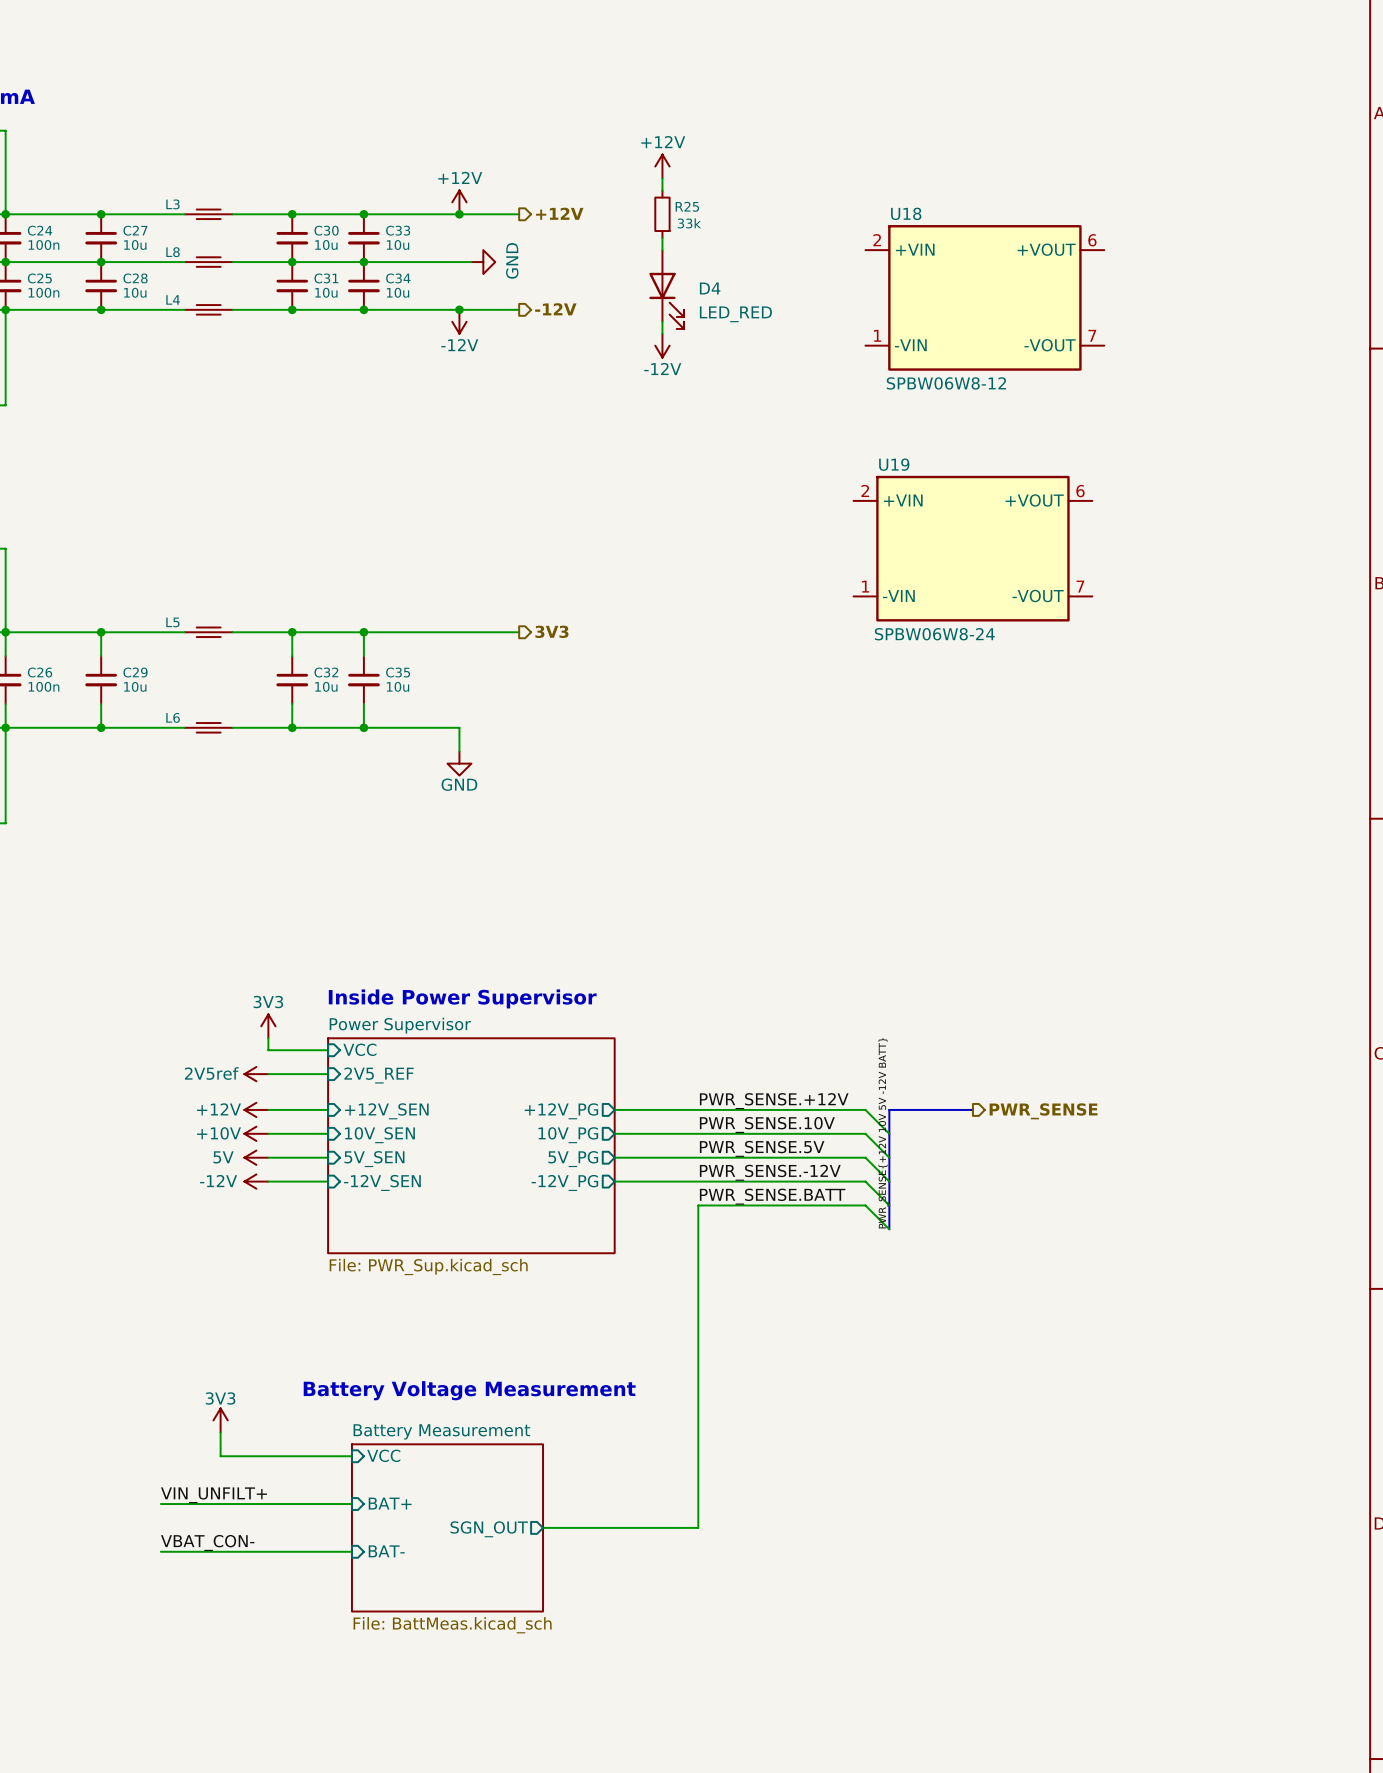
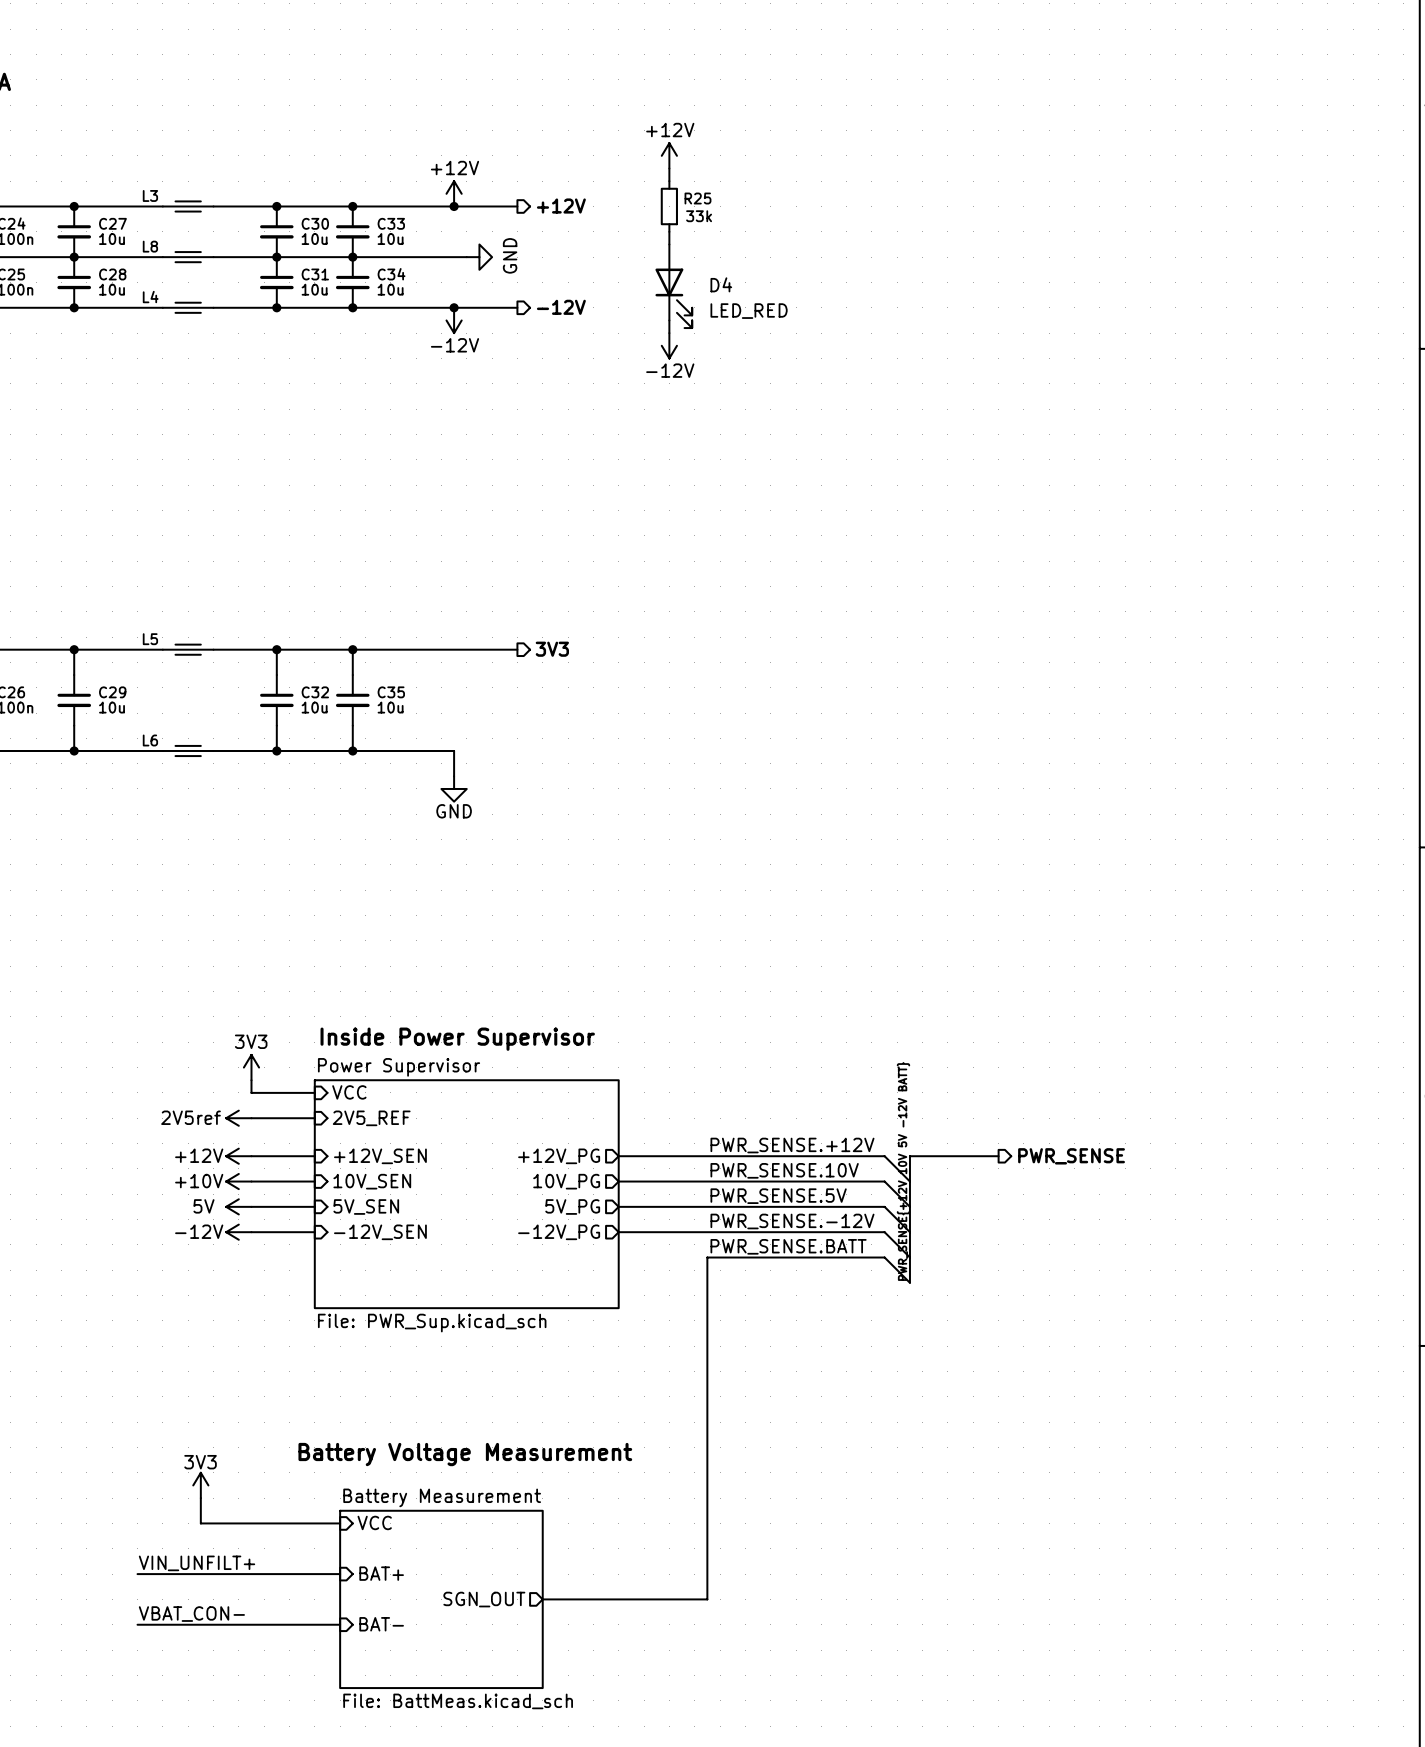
U18: (984, 297) -> none
U19: (972, 548) -> none

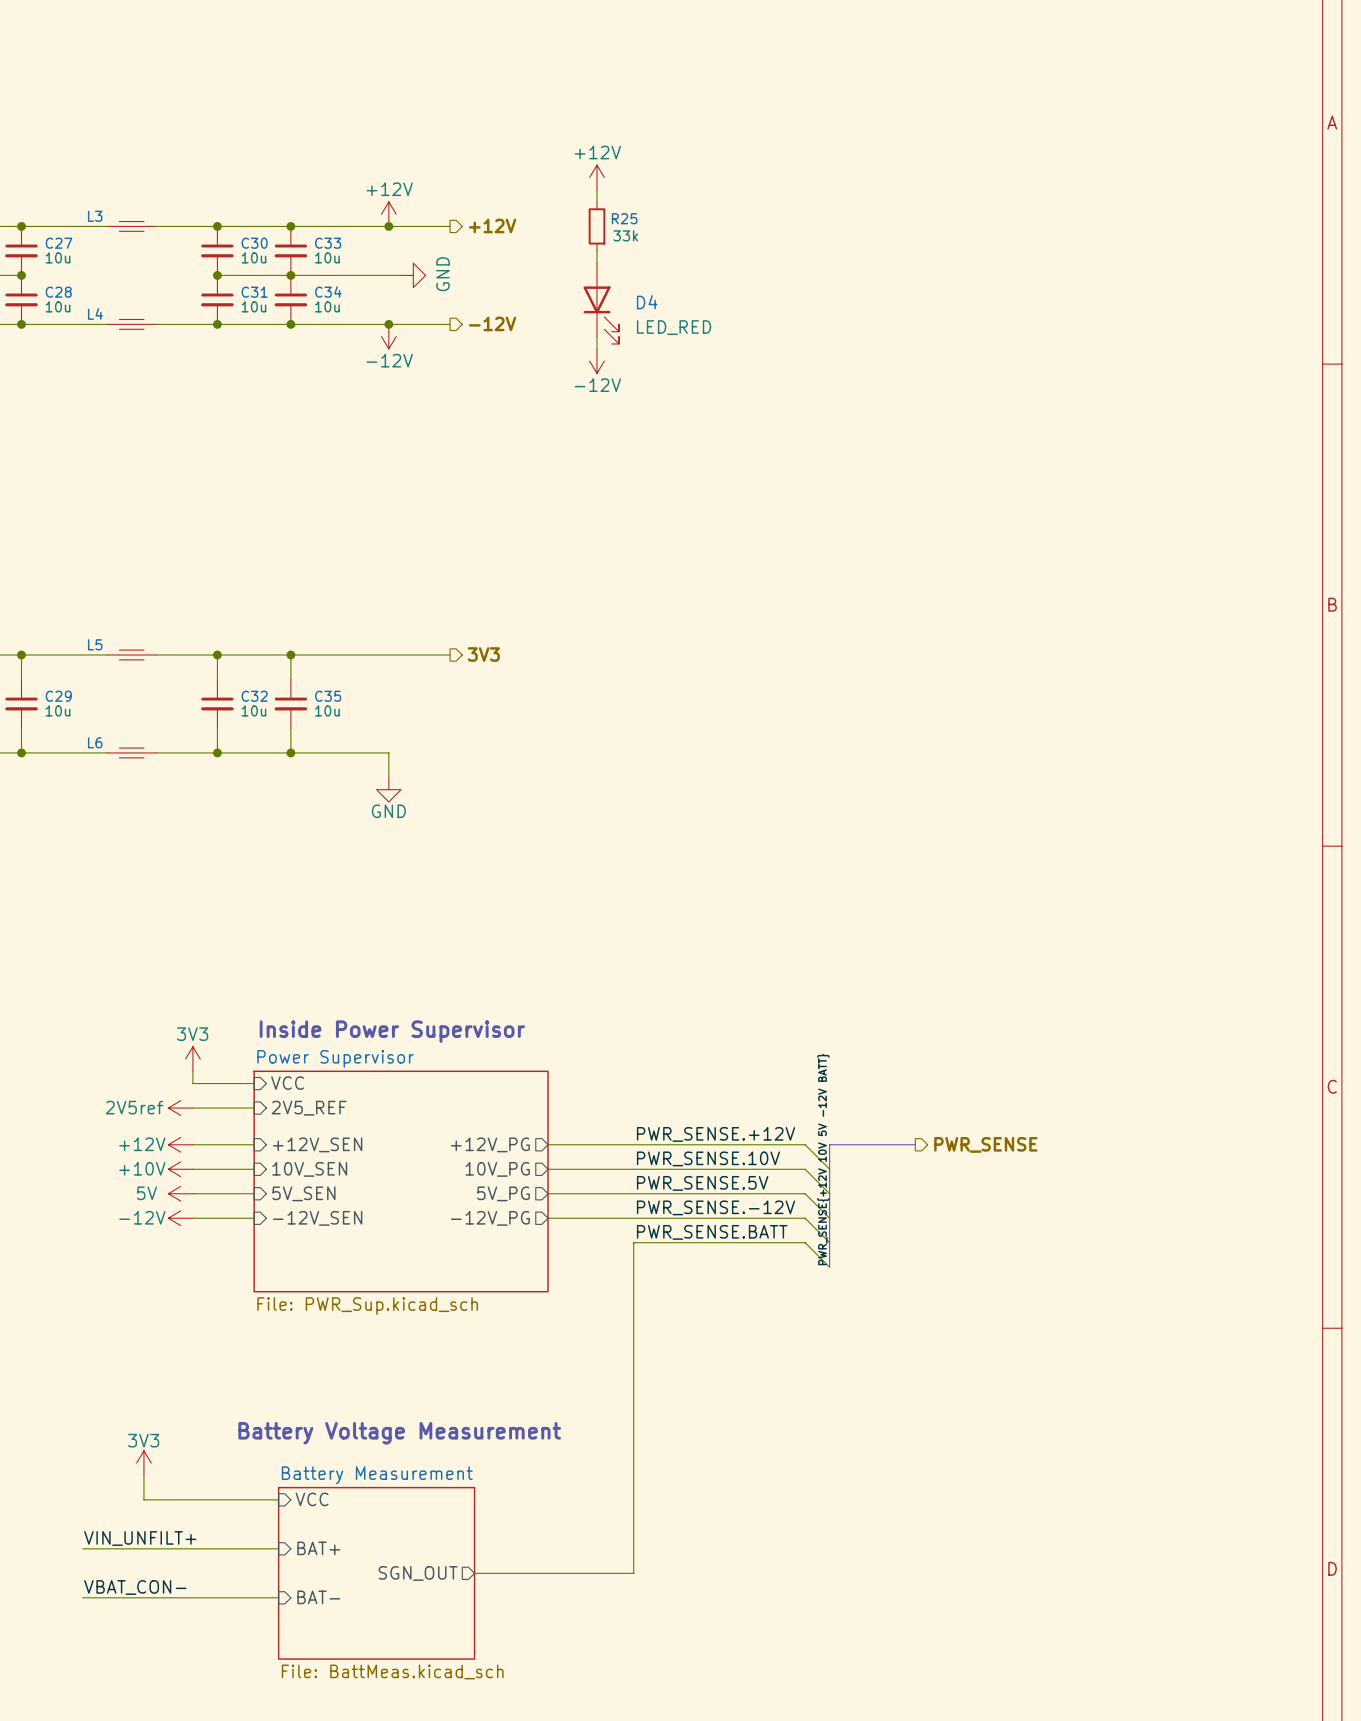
wire: (74, 257) (162, 257) -> none
L8: (188, 257) -> none
wire: (213, 257) (276, 257) -> none

